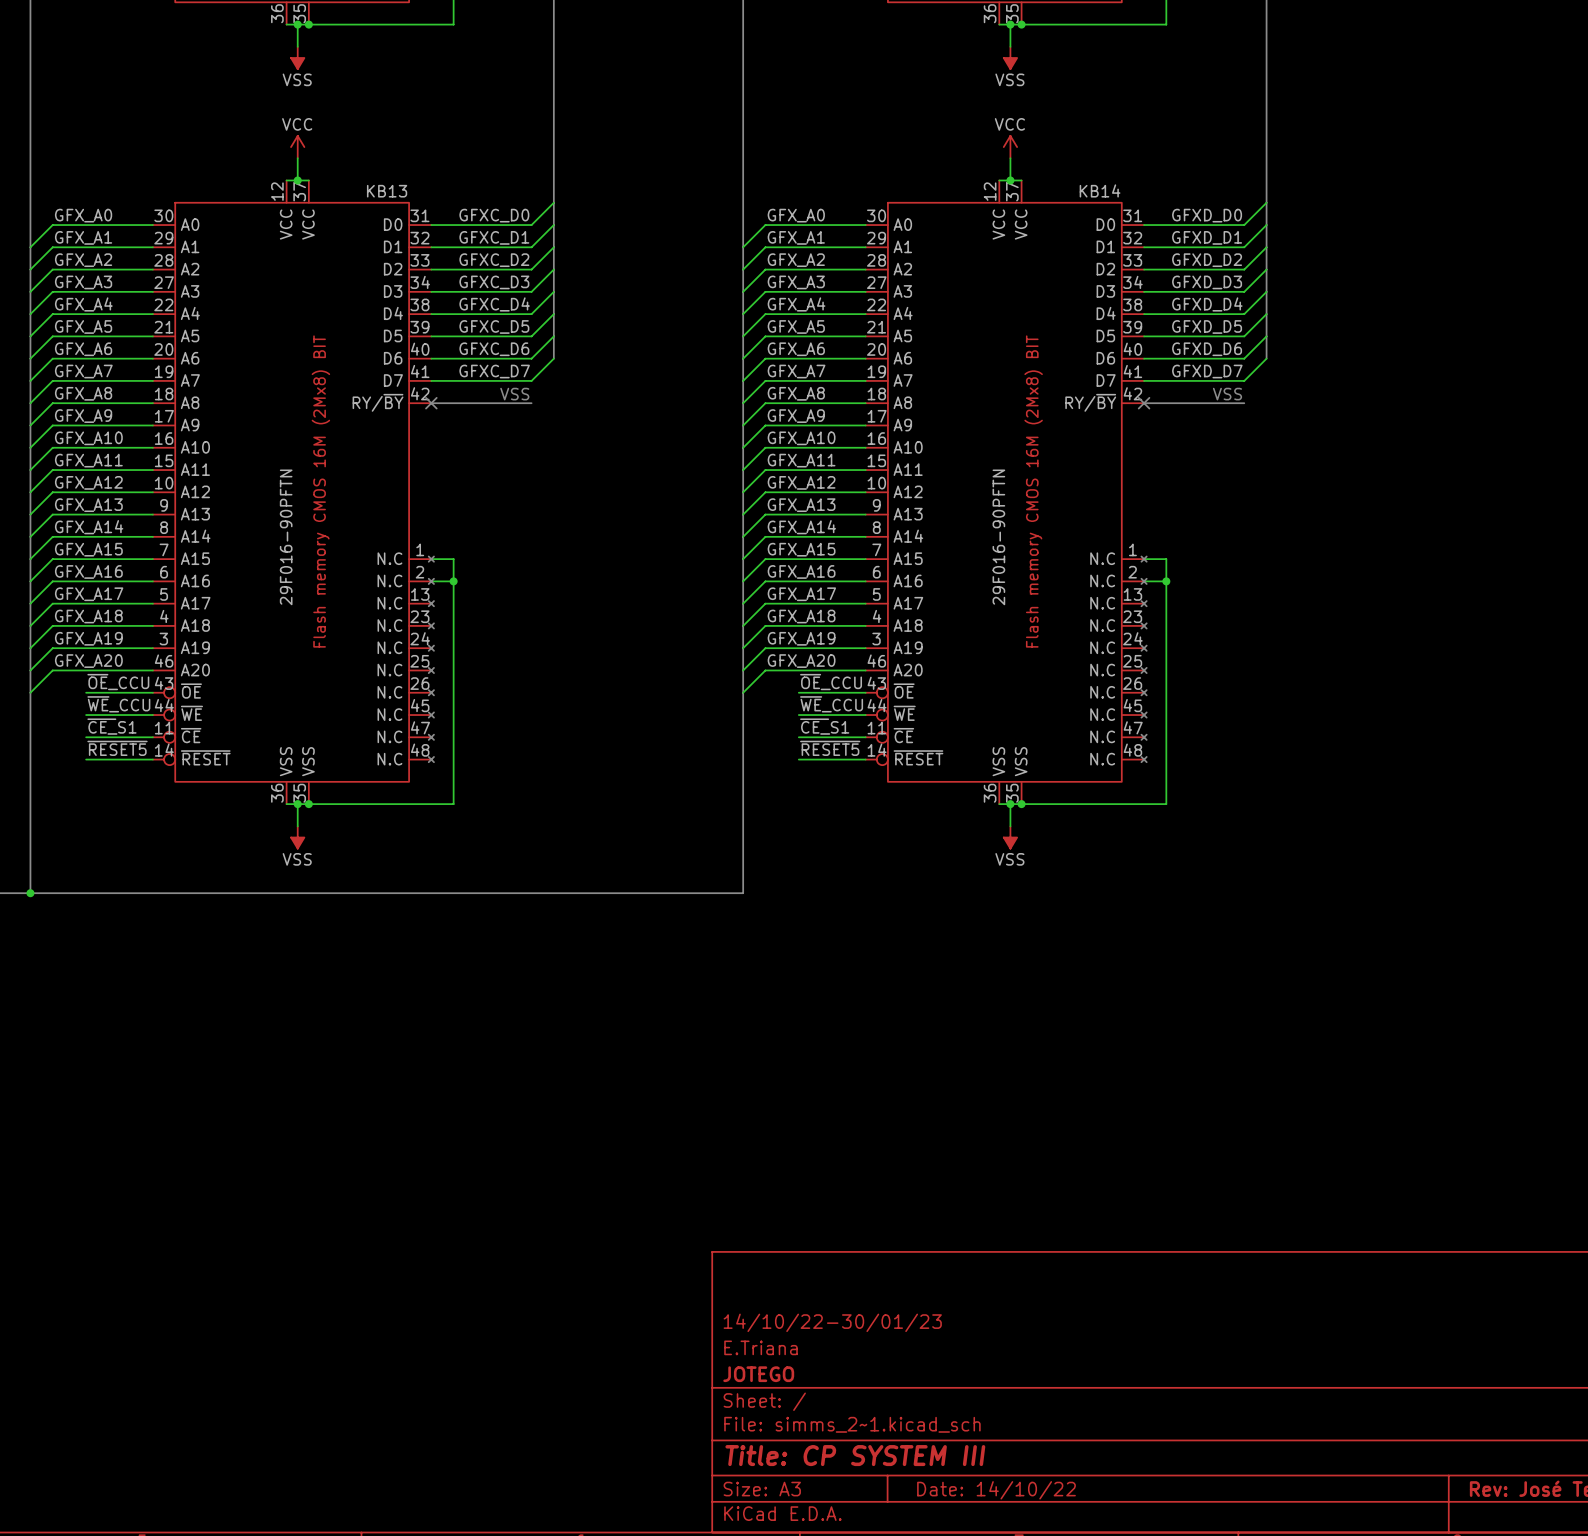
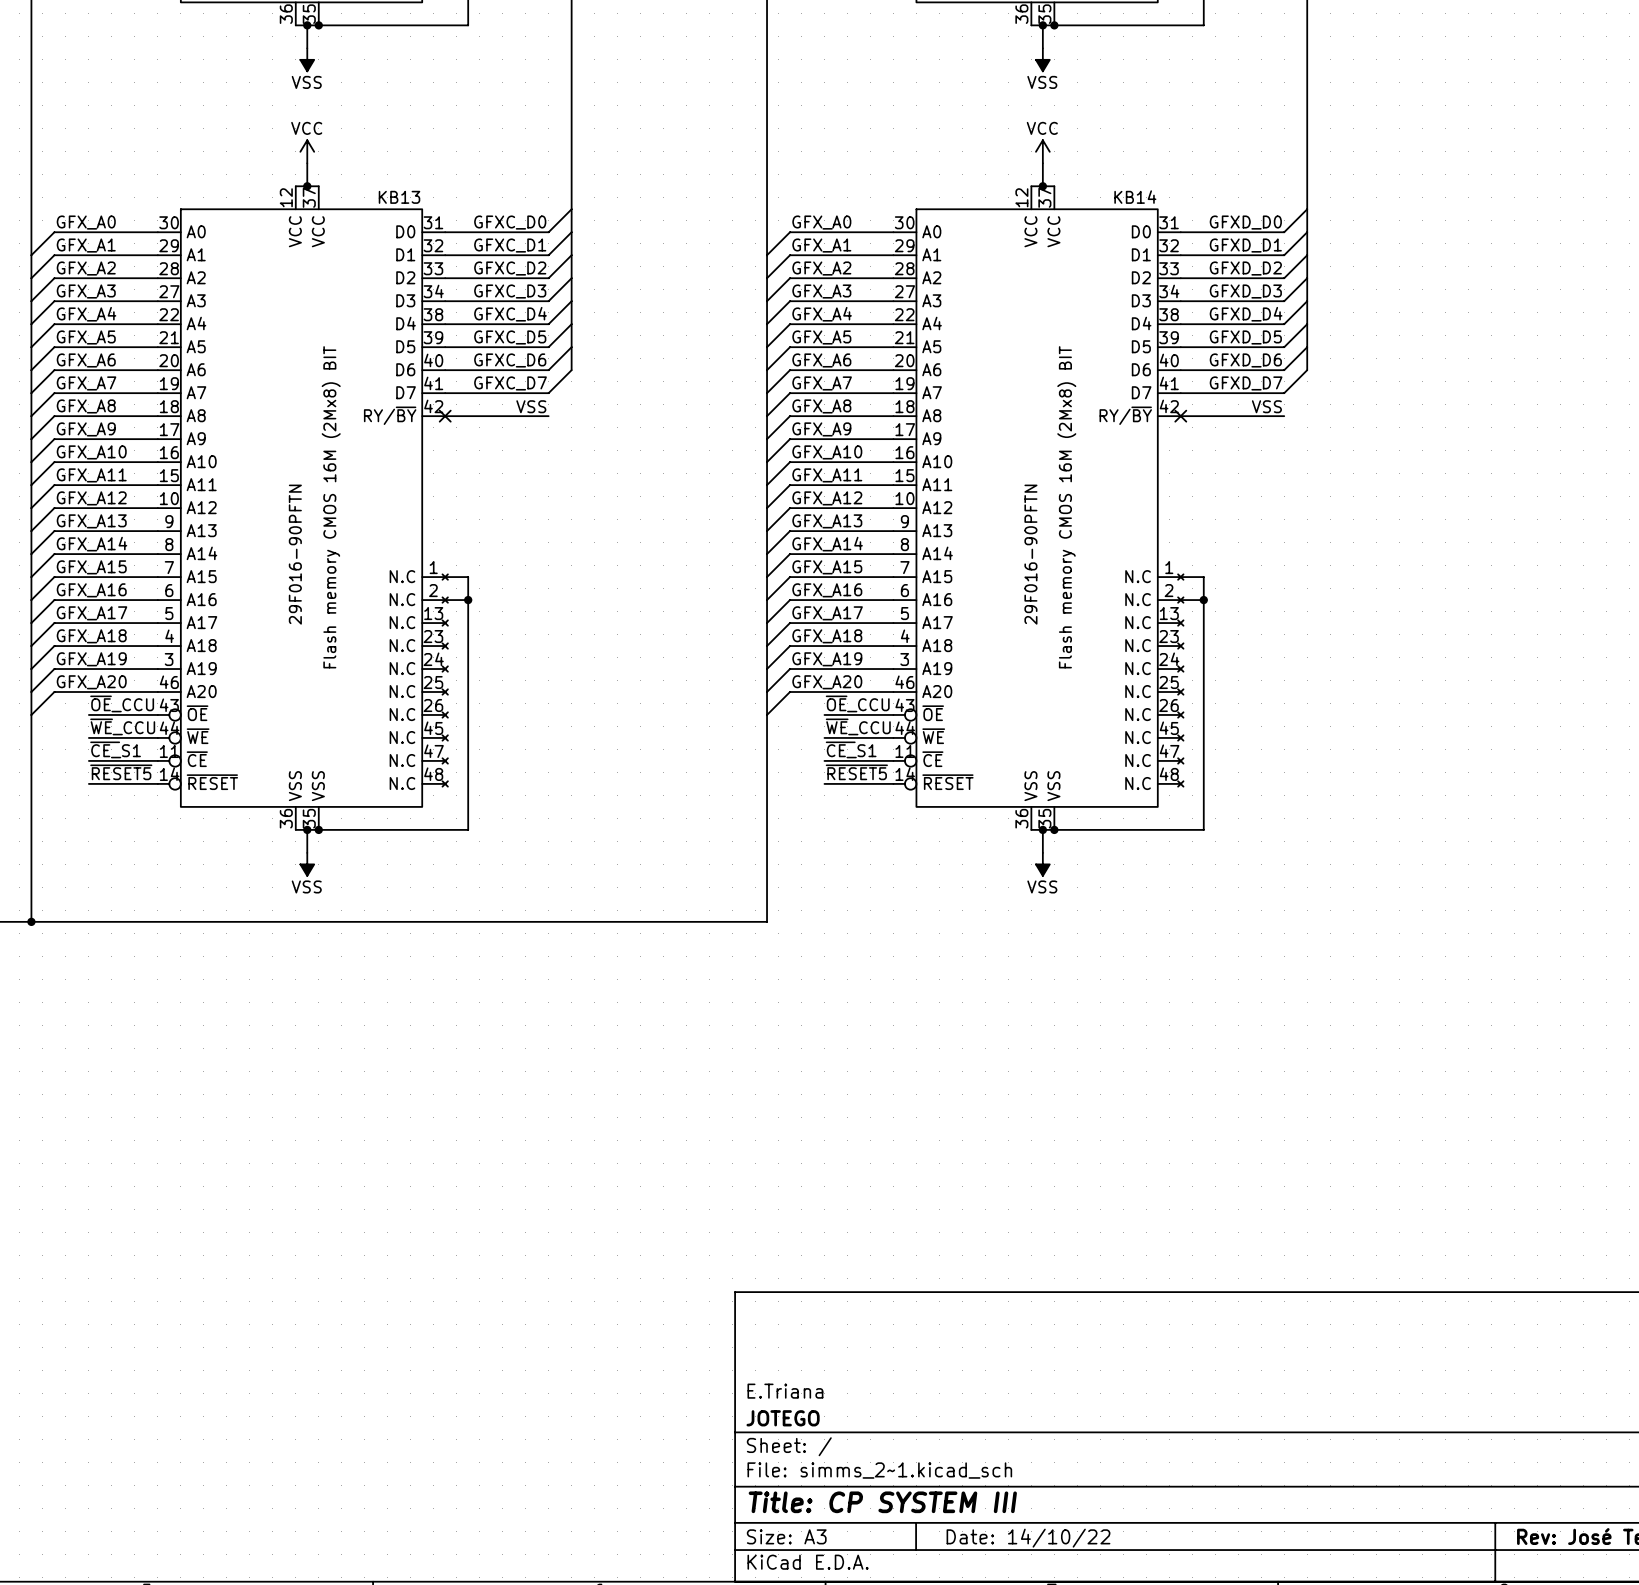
title block: 14/10/22-30/01/23 (832, 1322) -> none

